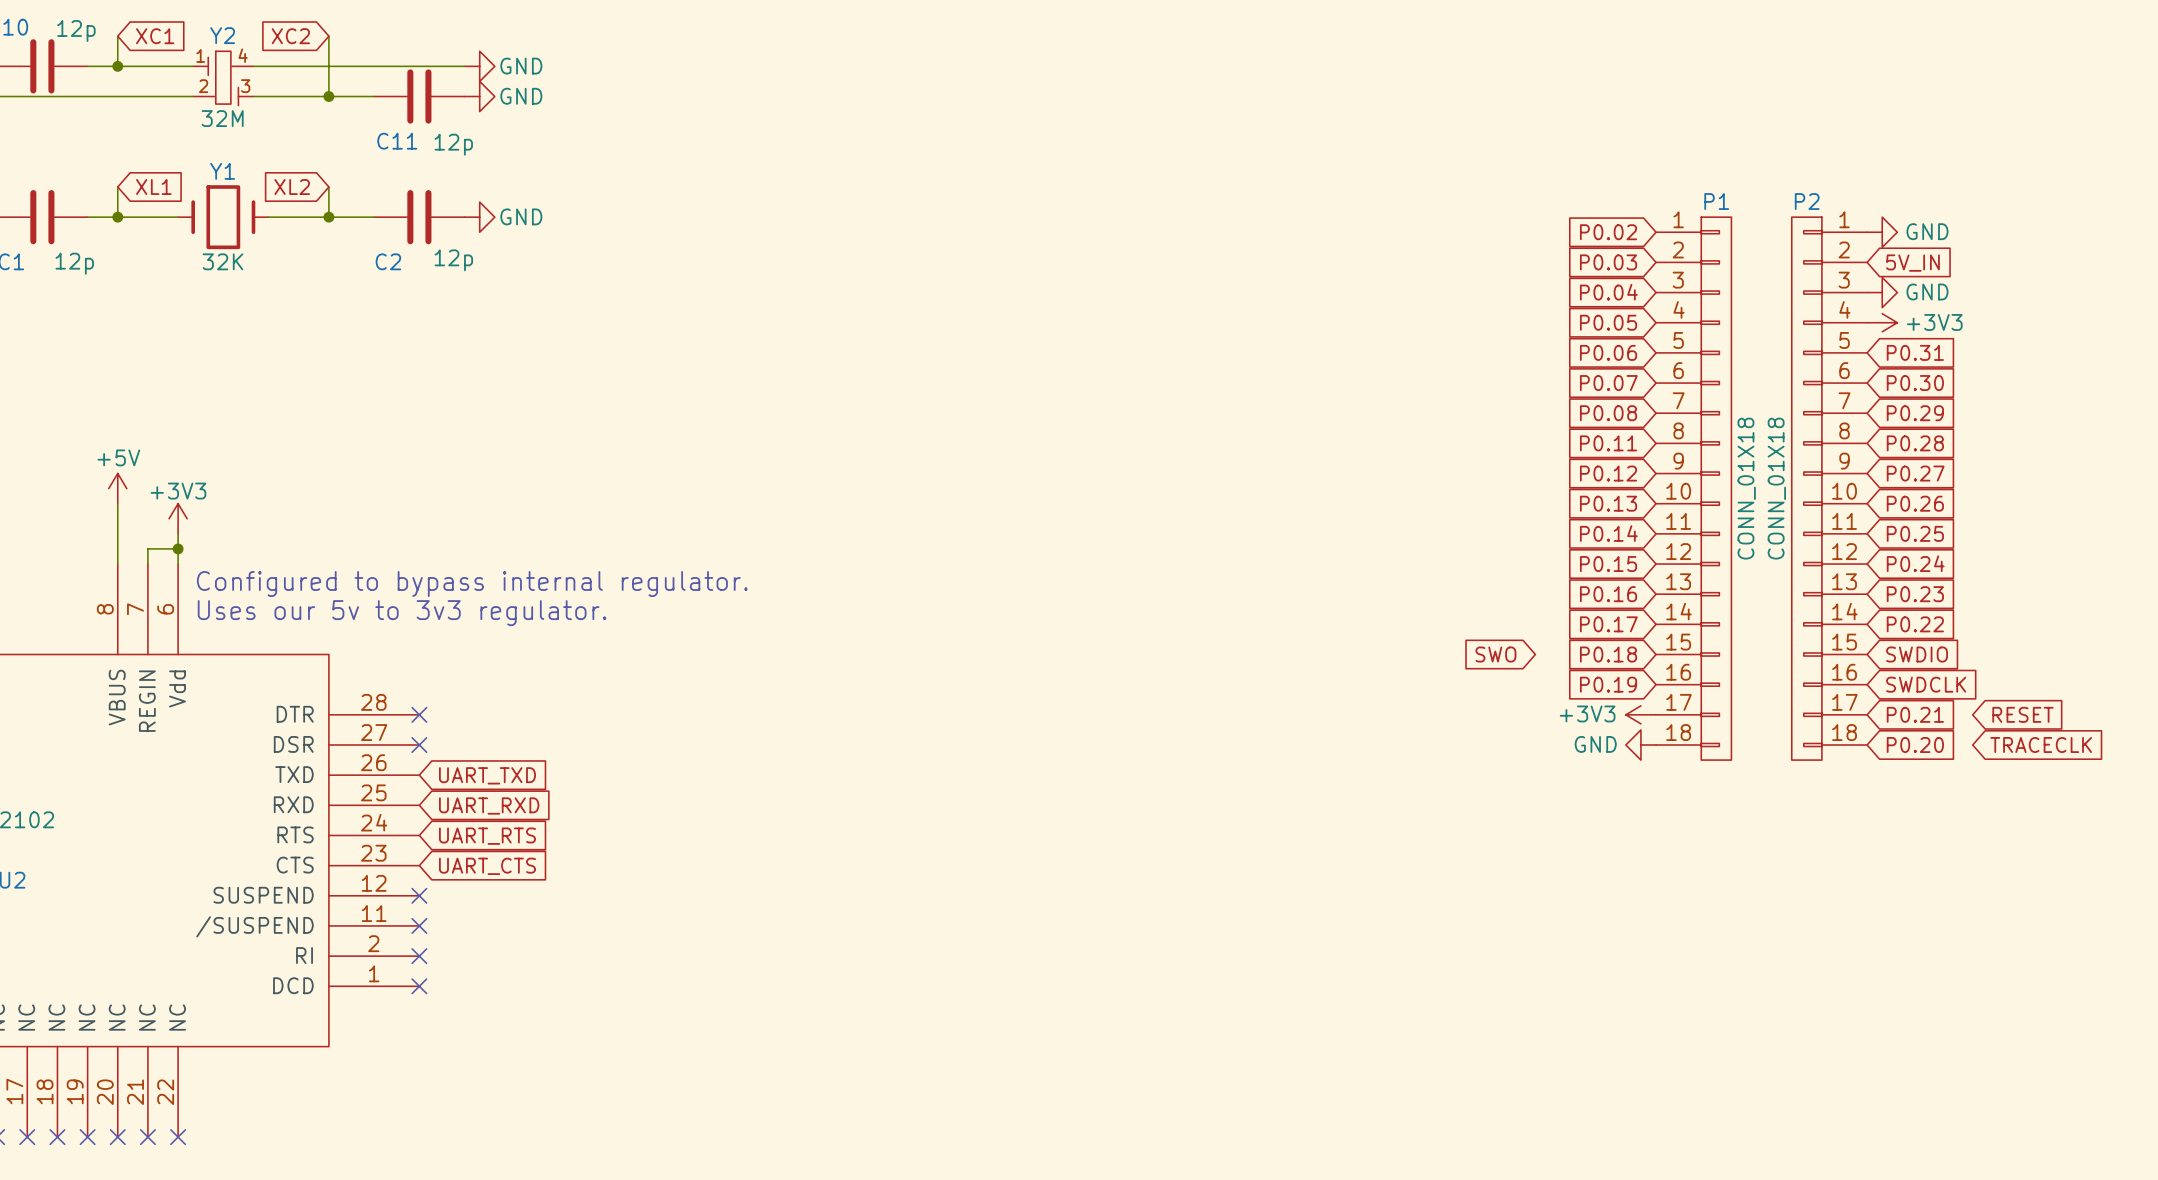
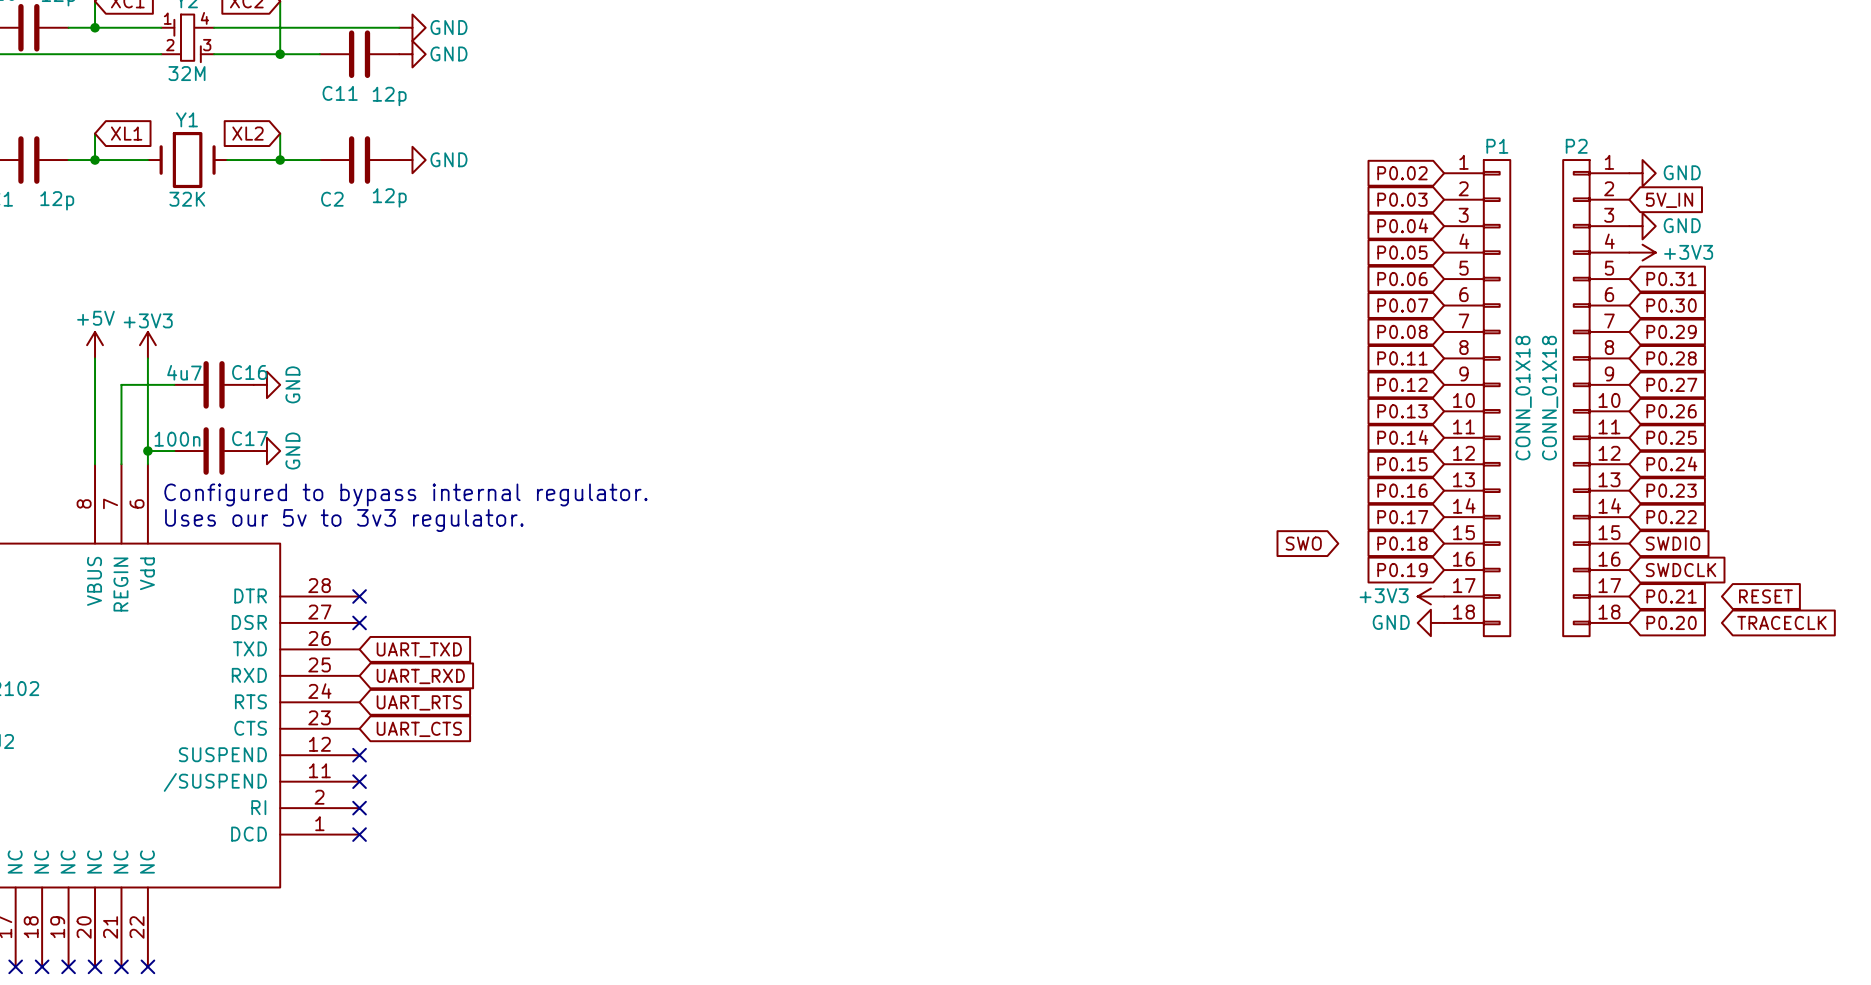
wire: none -> (147, 358) (147, 437)
wire: none -> (174, 384) (121, 384) (121, 451)
C16: none -> 4u7 (214, 384)
power symbol: none -> GND (266, 384)
power symbol position: +5V (117, 488) -> +5V (95, 345)
power symbol position: +3V3 (178, 518) -> +3V3 (147, 345)
wire: (147, 548) (178, 548) -> (174, 451) (147, 451)
C17: none -> 100n (214, 451)
power symbol: none -> GND (266, 451)
text position: Configured to bypass internal regulator. (472, 583) -> Configured to bypass internal regulator. (405, 494)
text position: Uses our 5v to 3v3 regulator. (402, 613) -> Uses our 5v to 3v3 regulator. (344, 520)

